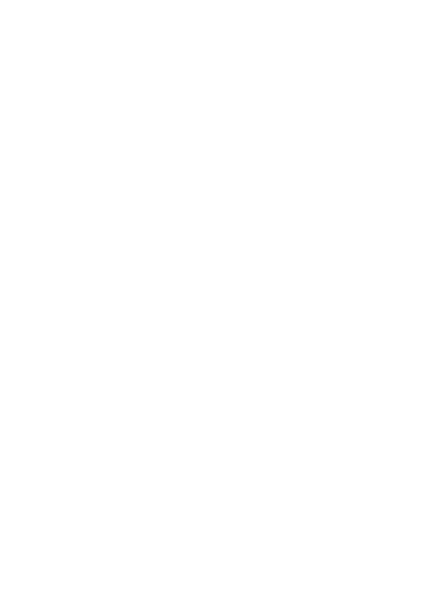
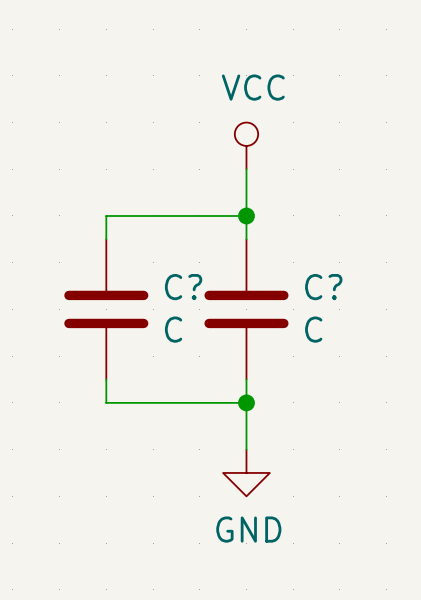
power symbol: none -> VCC (246, 145)
wire: none -> (246, 169) (246, 239)
wire: none -> (246, 215) (106, 215) (106, 239)
junction: none -> (246, 215)
C?: none -> C (106, 309)
C?: none -> C (246, 309)
wire: none -> (106, 379) (106, 402) (246, 402)
wire: none -> (246, 379) (246, 449)
junction: none -> (246, 402)
power symbol: none -> GND (246, 472)

